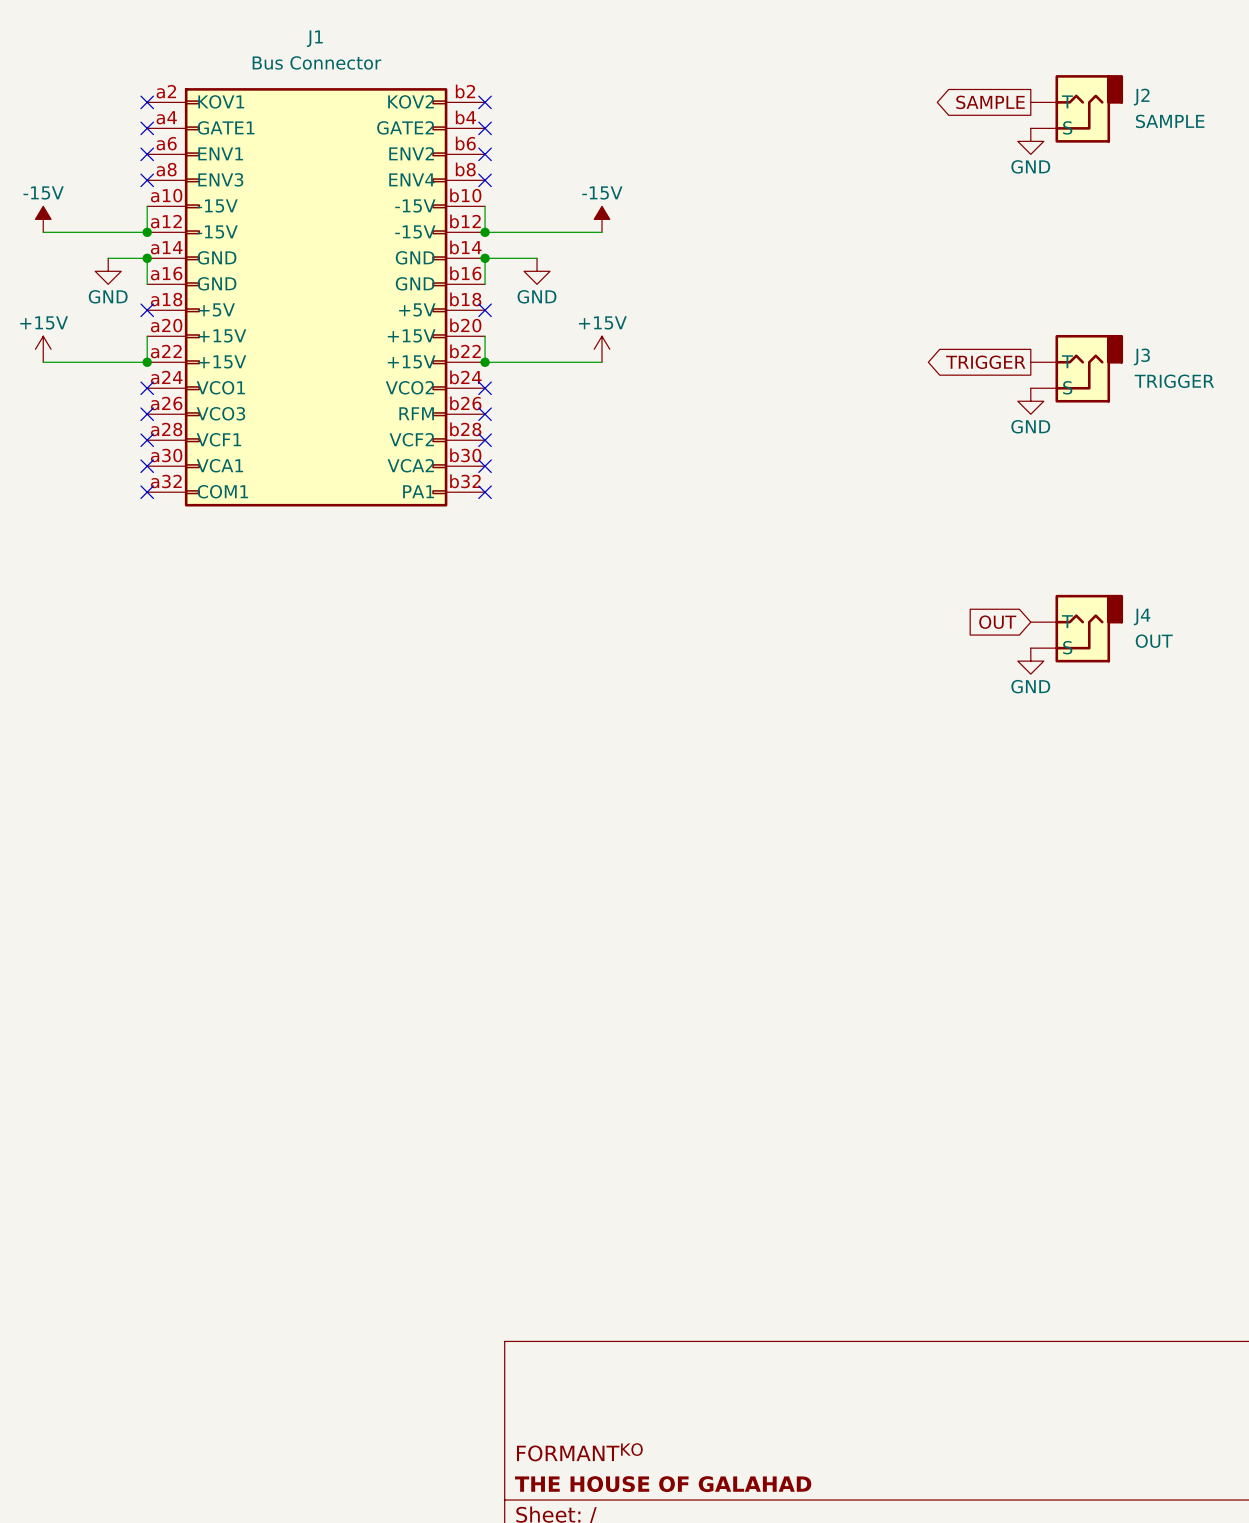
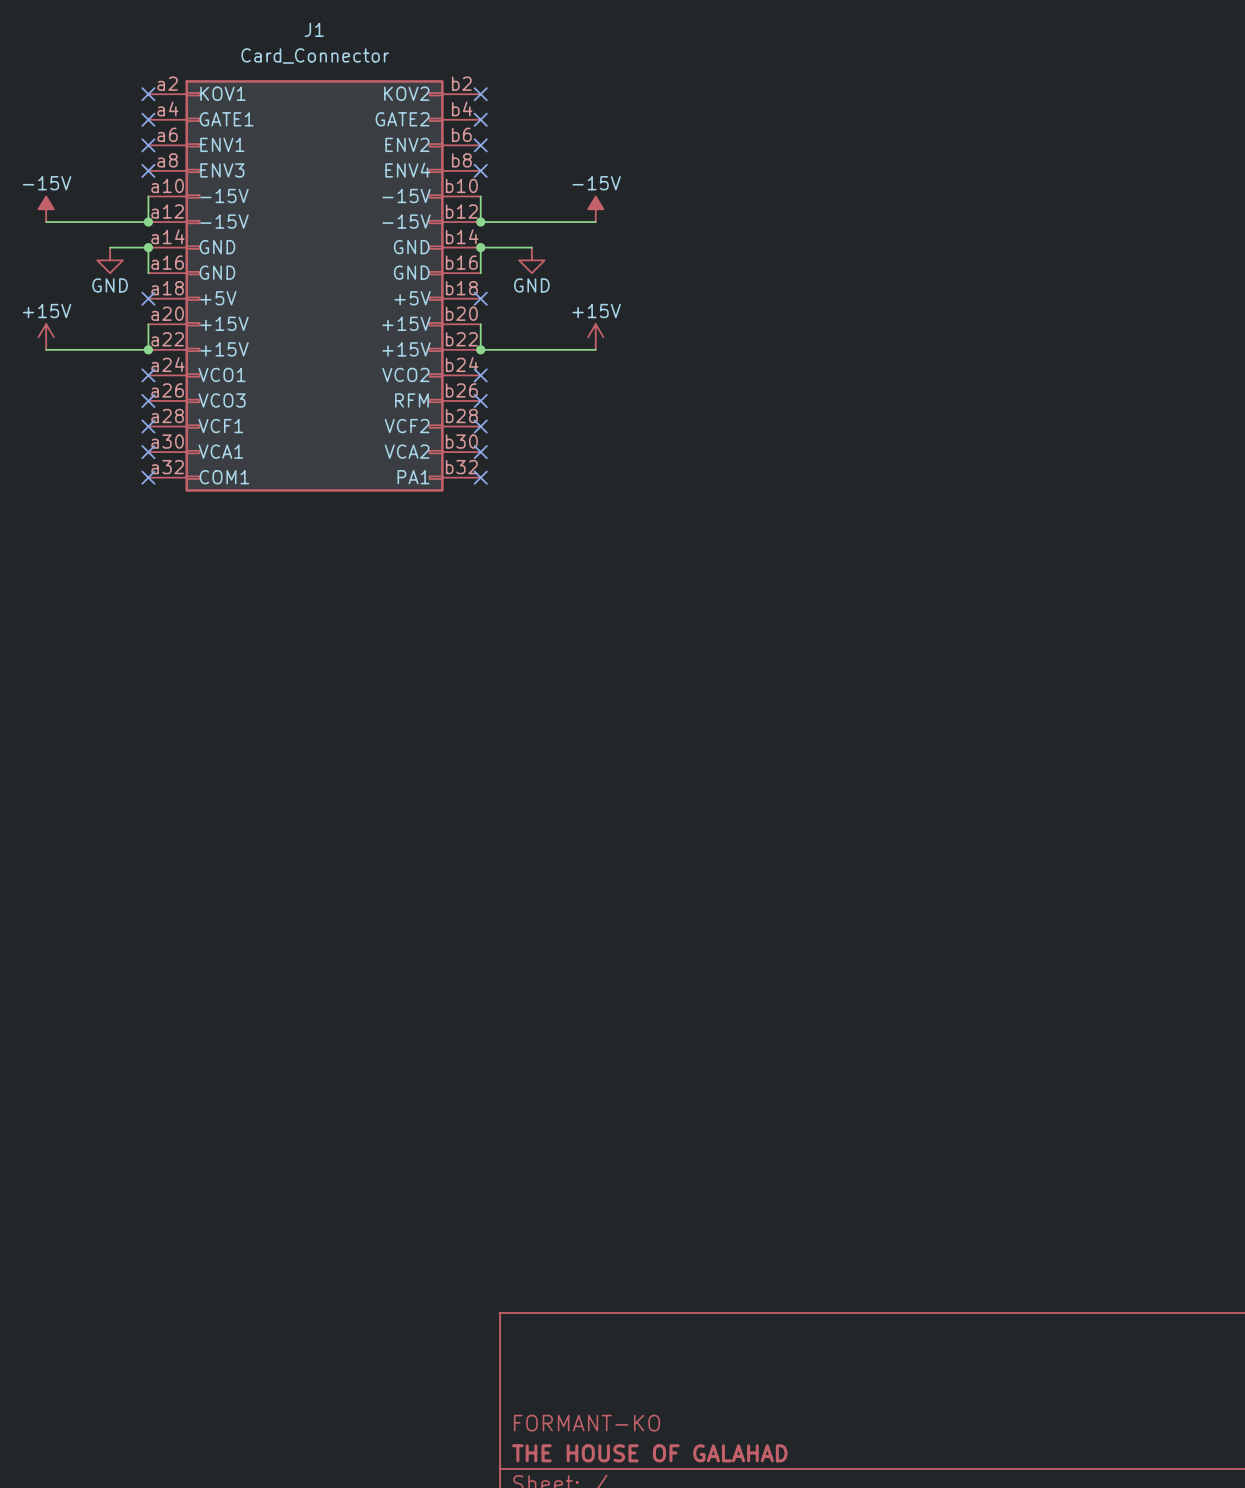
J1 value: Bus Connector (317, 62) -> Card_Connector (315, 56)
global label: SAMPLE (990, 102) -> none
J2: SAMPLE (1076, 108) -> none
power symbol: GND (1030, 141) -> none
global label: TRIGGER (985, 362) -> none
J3: TRIGGER (1076, 368) -> none
power symbol: GND (1030, 401) -> none
global label: OUT (997, 622) -> none
J4: OUT (1076, 628) -> none
power symbol: GND (1030, 661) -> none
title block: FORMANTKO (579, 1452) -> FORMANT-KO (586, 1423)

